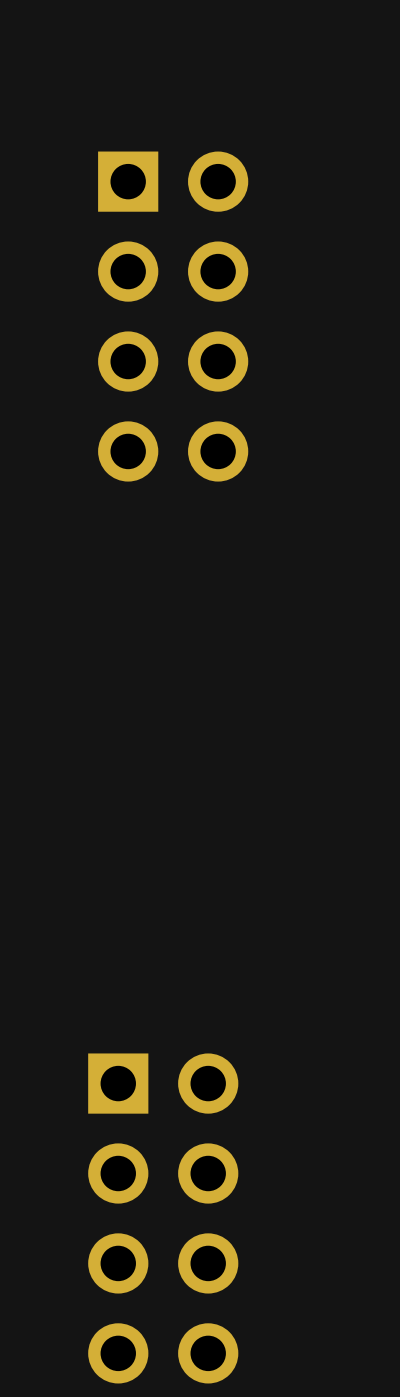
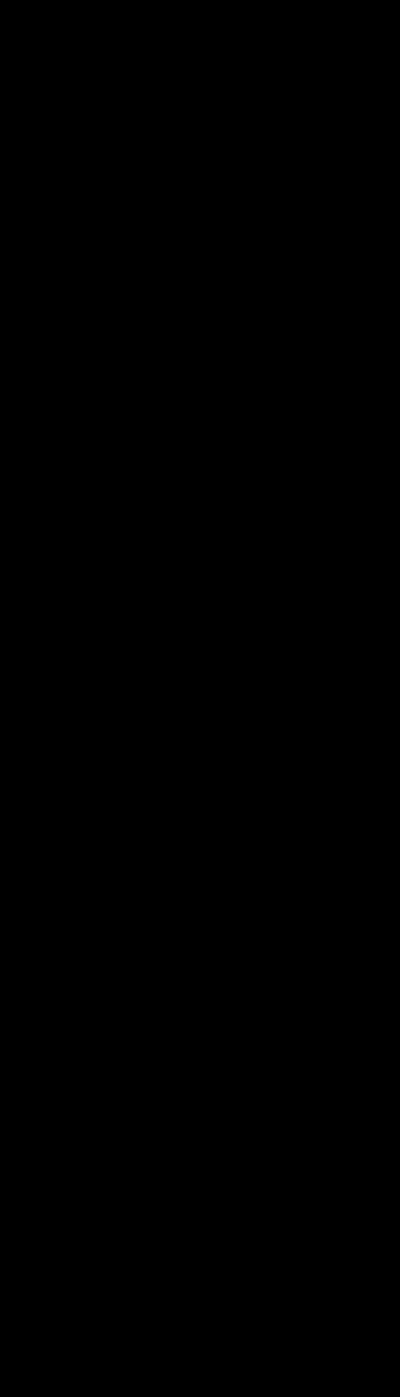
part: (173, 316) -> none
part: (163, 1218) -> none

